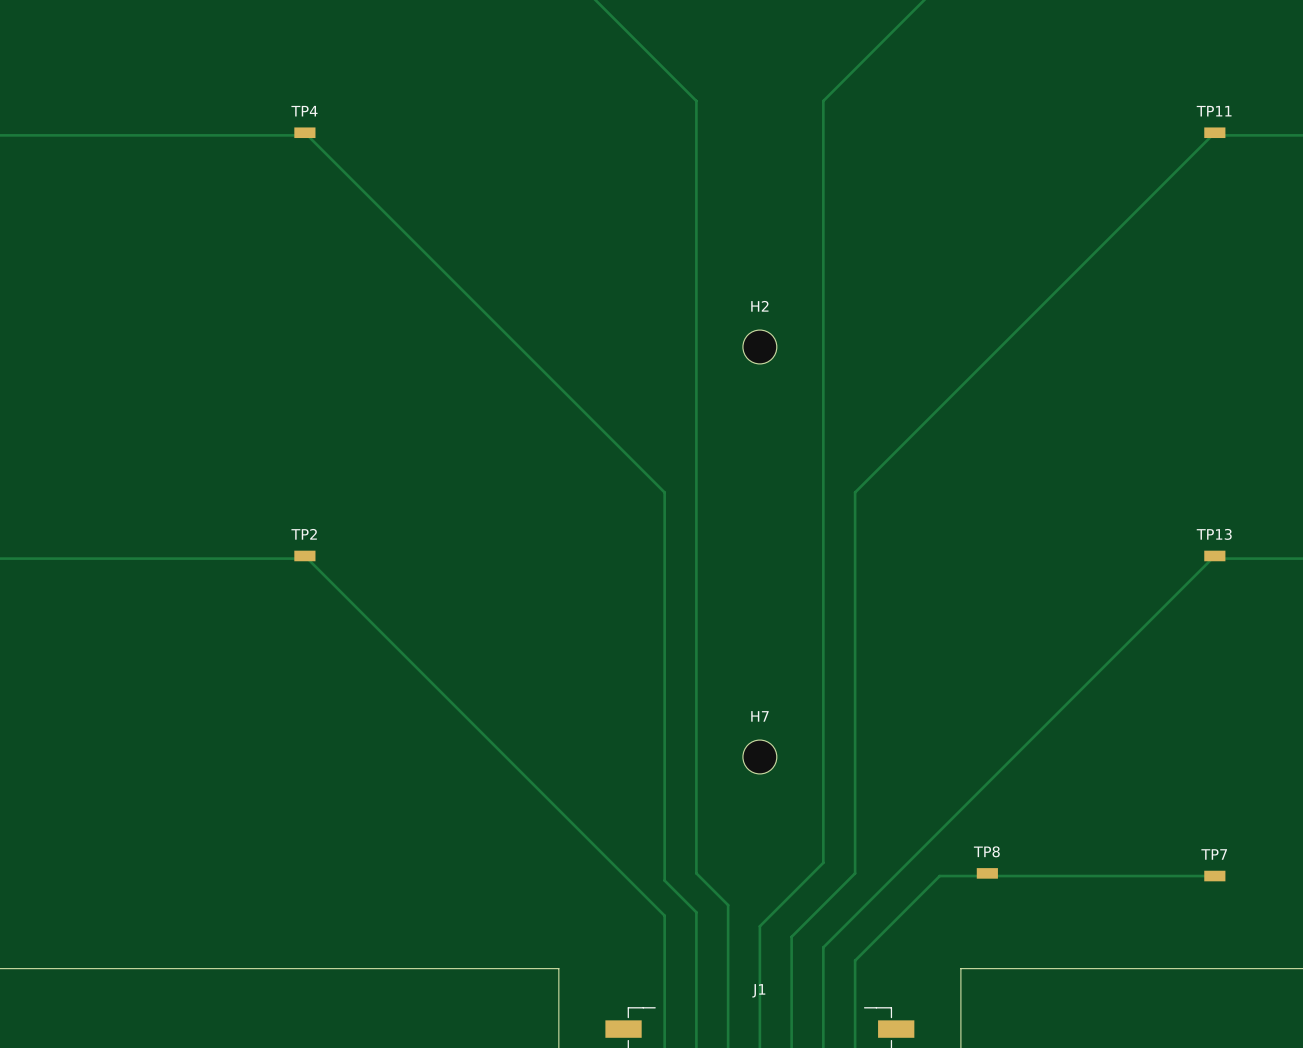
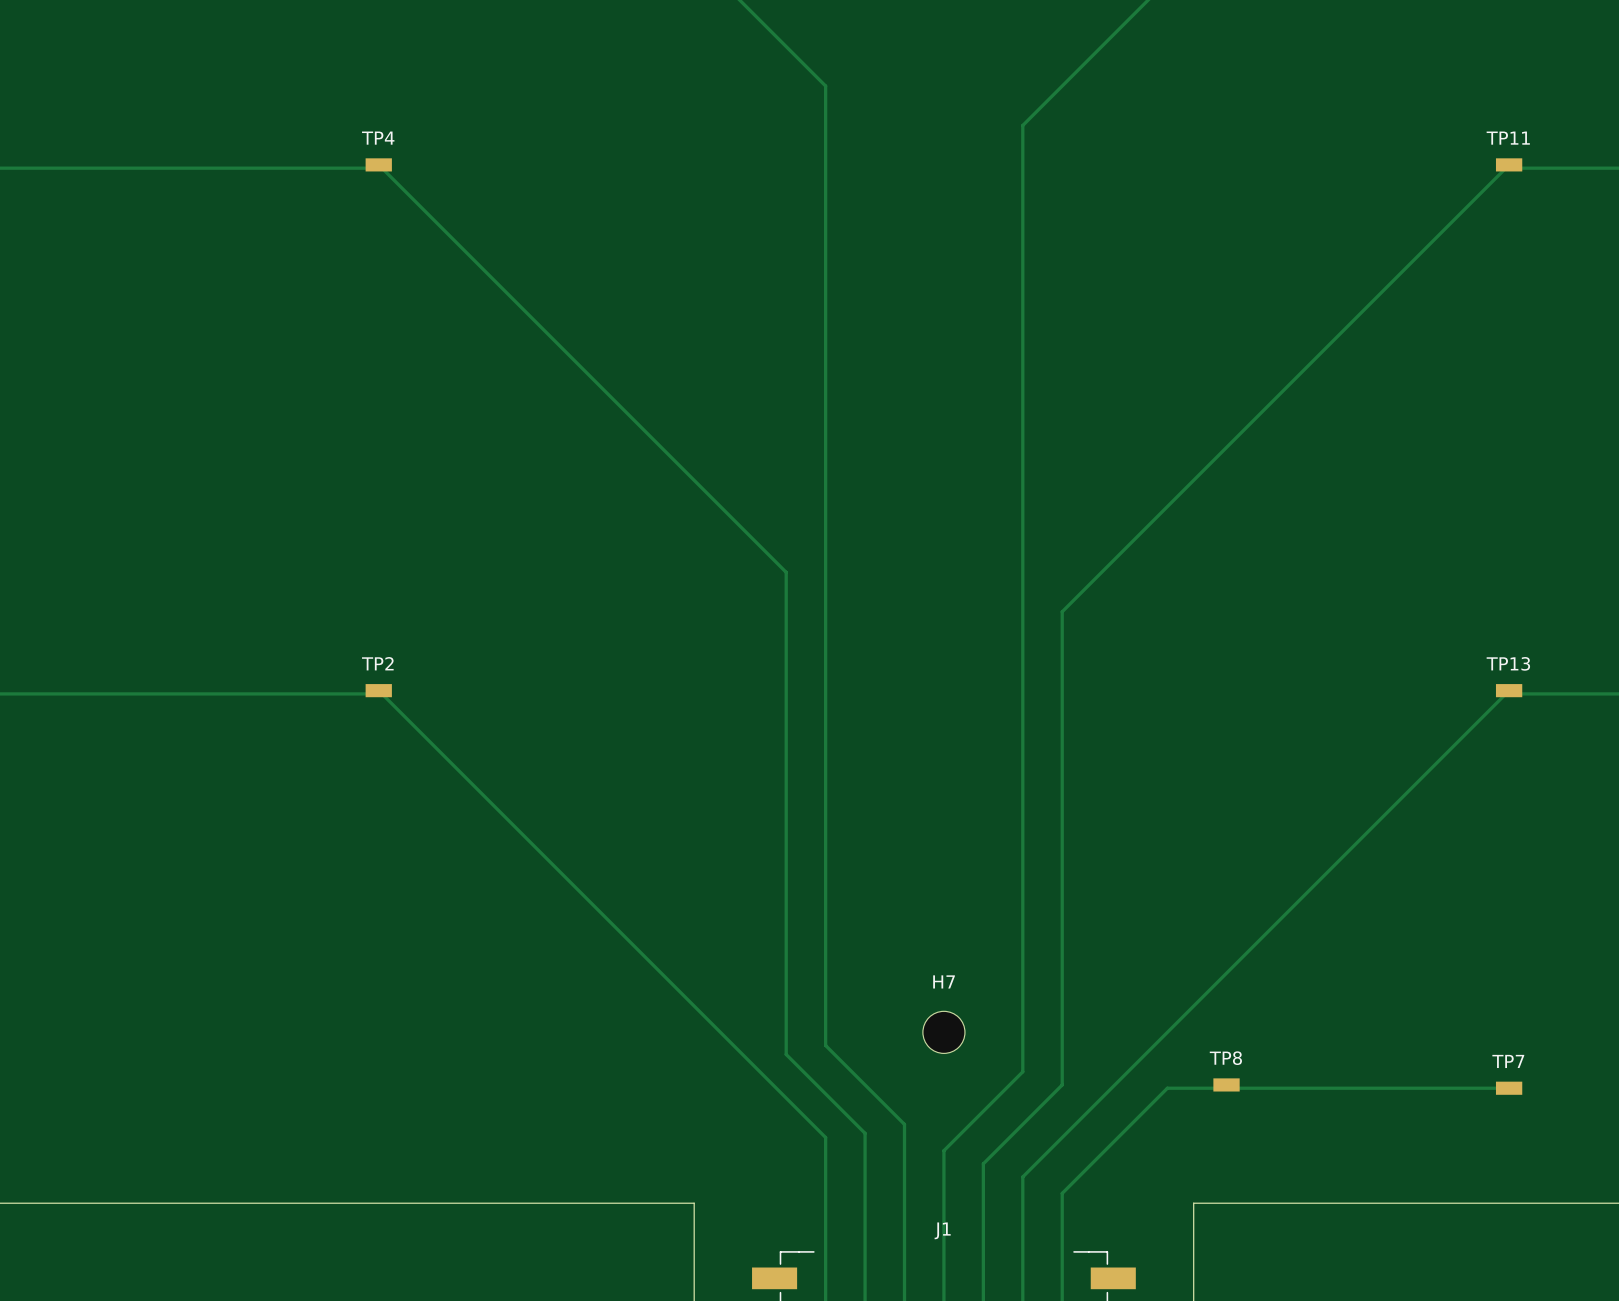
track: (664, 69) (696, 100) (696, 873) -> (825, 86) (825, 611)
H2: (759, 346) -> none
track: (632, 460) (664, 492) -> (786, 572) (786, 1054) (825, 1093)
H7 position: (759, 757) -> (943, 1032)
track: (664, 841) (664, 880) -> (825, 1045) (865, 1084)

